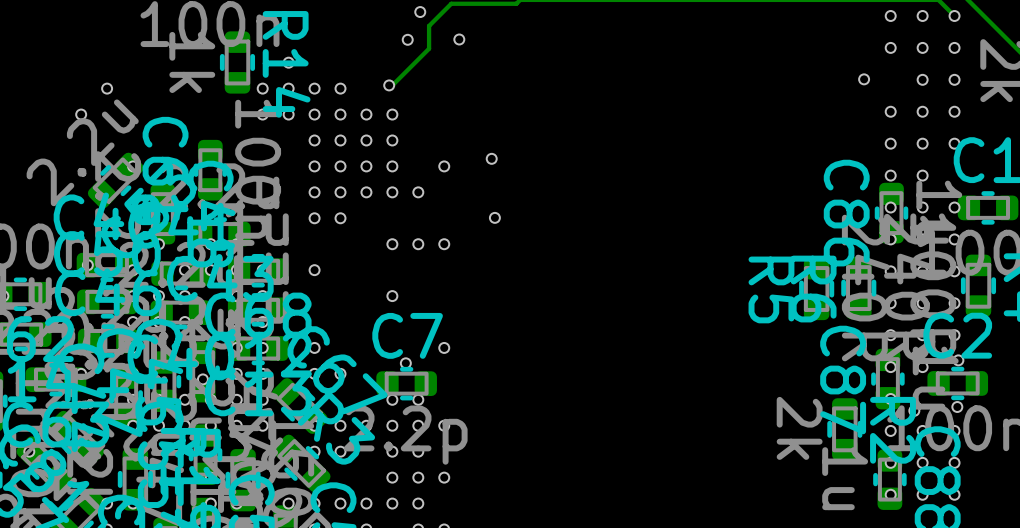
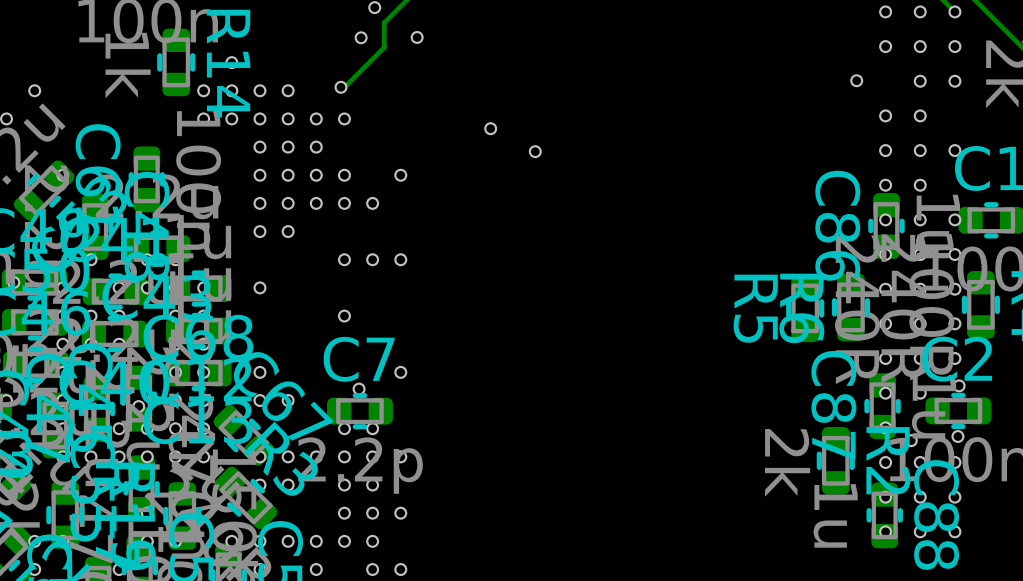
via: (954, 111) -> none
via: none -> (490, 128)
via: (392, 140) -> none
via: none -> (535, 151)
via: (491, 158) -> none
via: (494, 217) -> none

